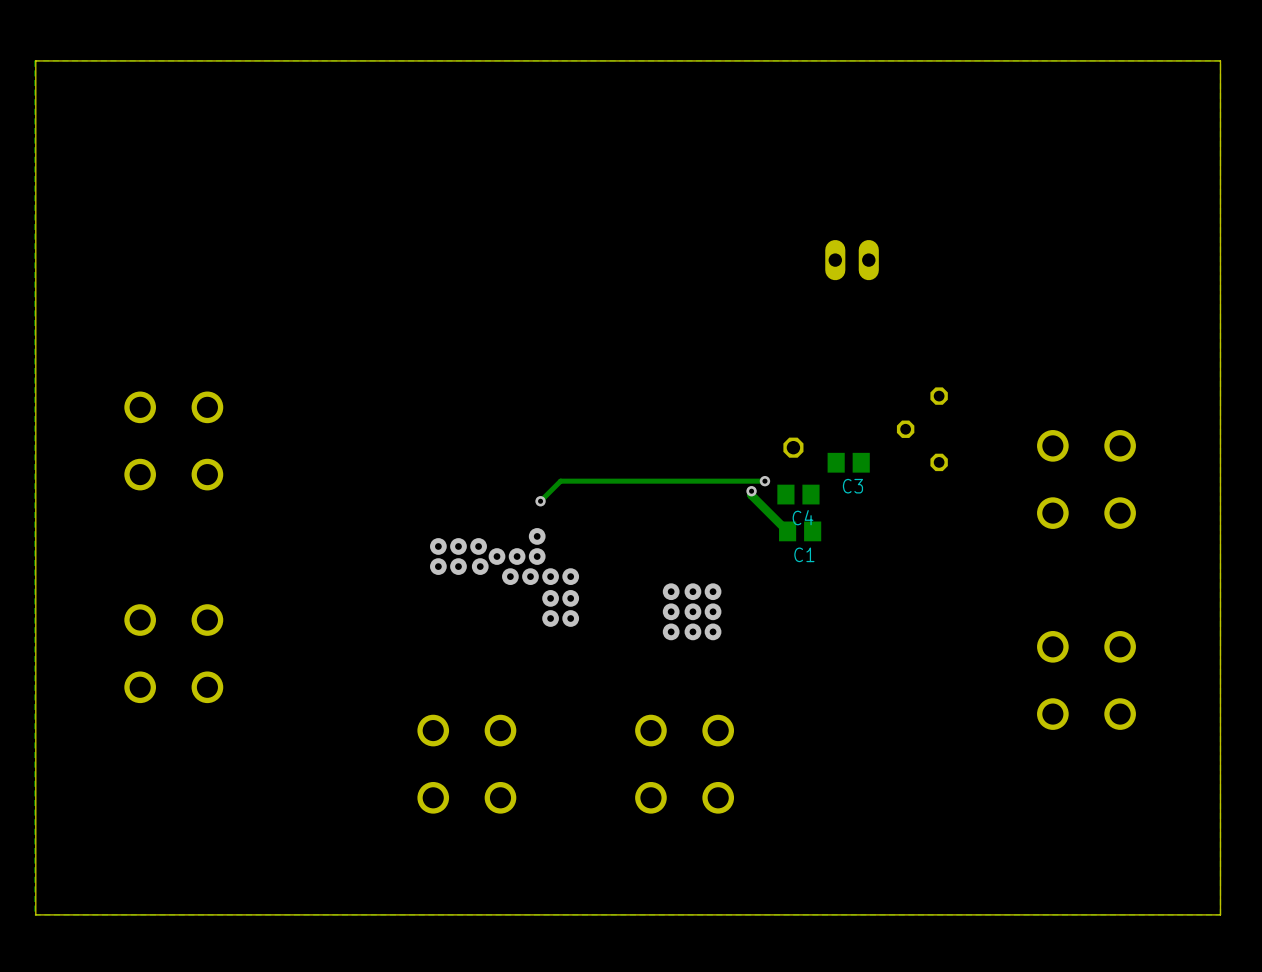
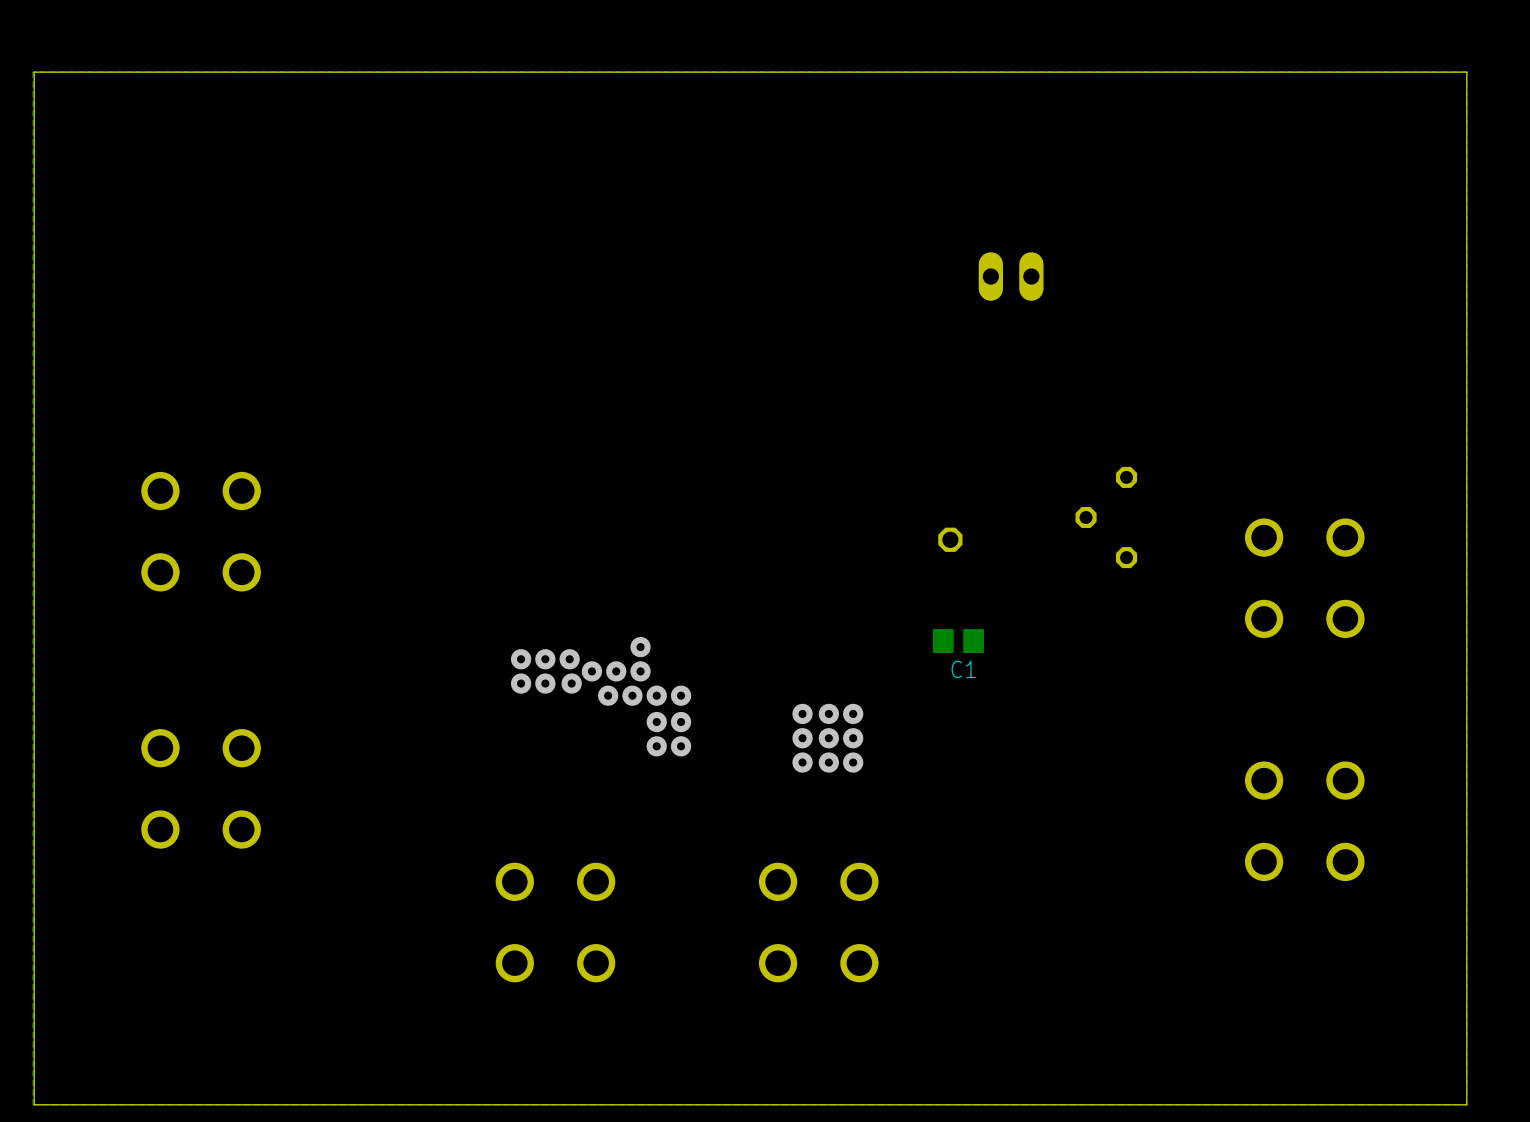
part position: (852, 260) -> (1011, 276)
C3: (848, 462) -> none
track: (764, 481) (560, 481) (540, 501) -> none
via: (764, 481) -> none
track: (751, 491) (751, 495) (787, 531) -> none
via: (751, 491) -> none
C4: (798, 494) -> none
via: (540, 501) -> none

